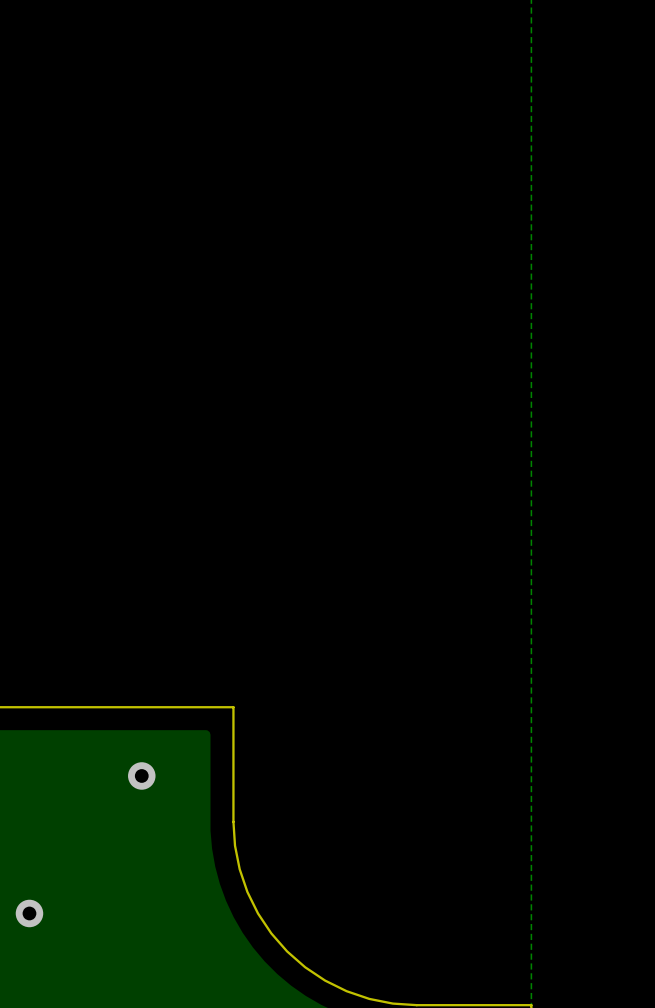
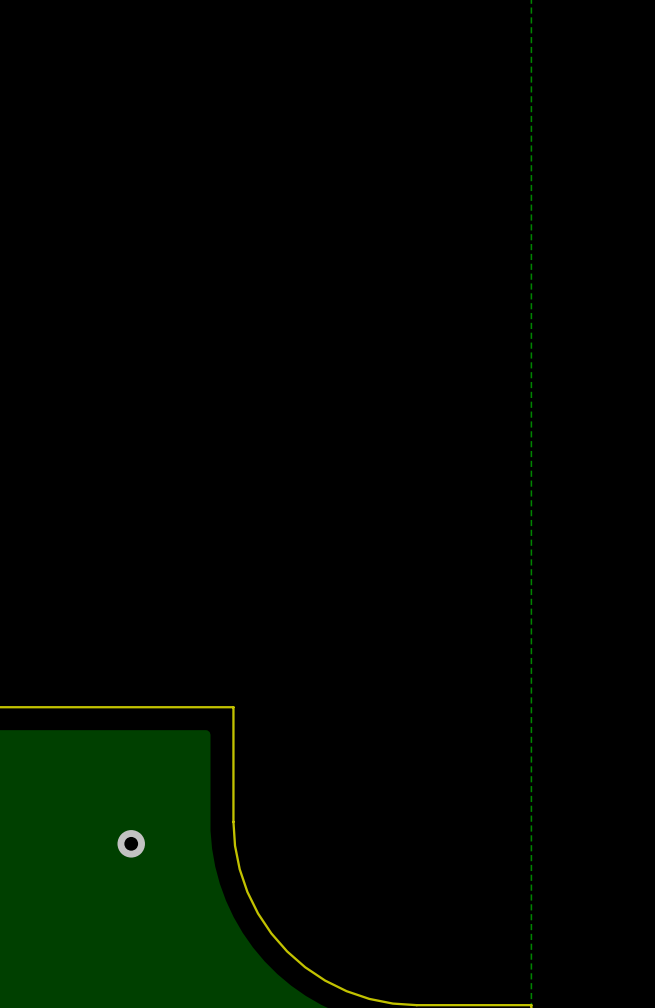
via: (141, 775) -> none
via: none -> (131, 843)
via: (29, 913) -> none

